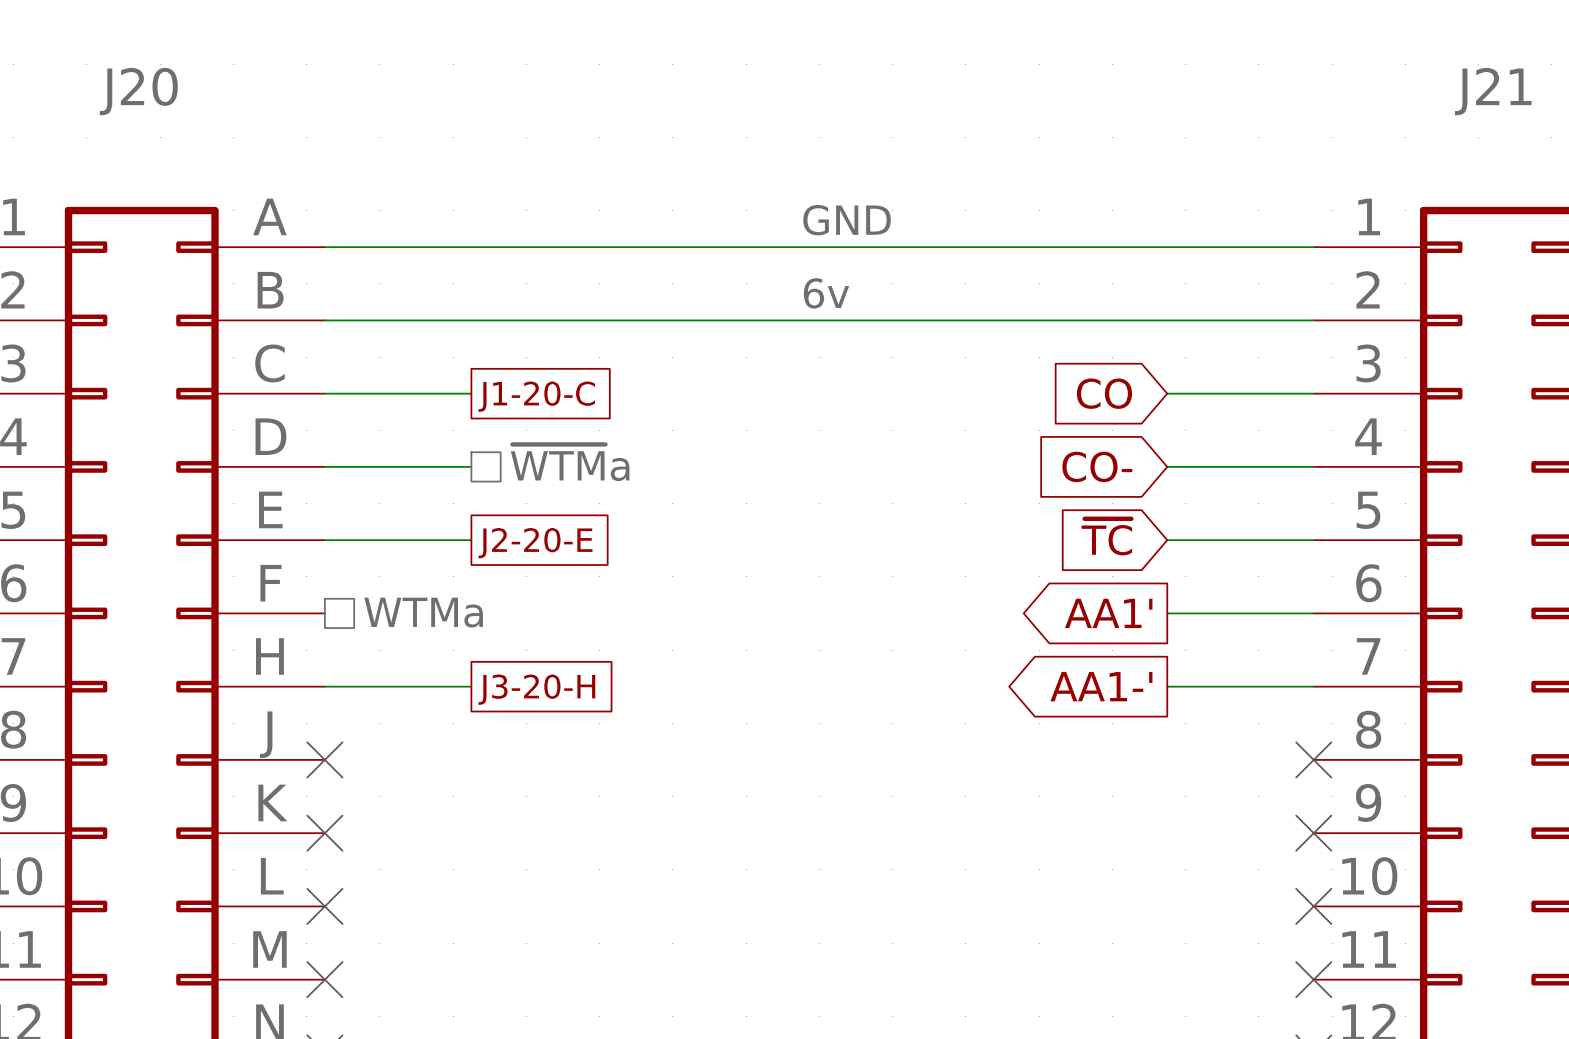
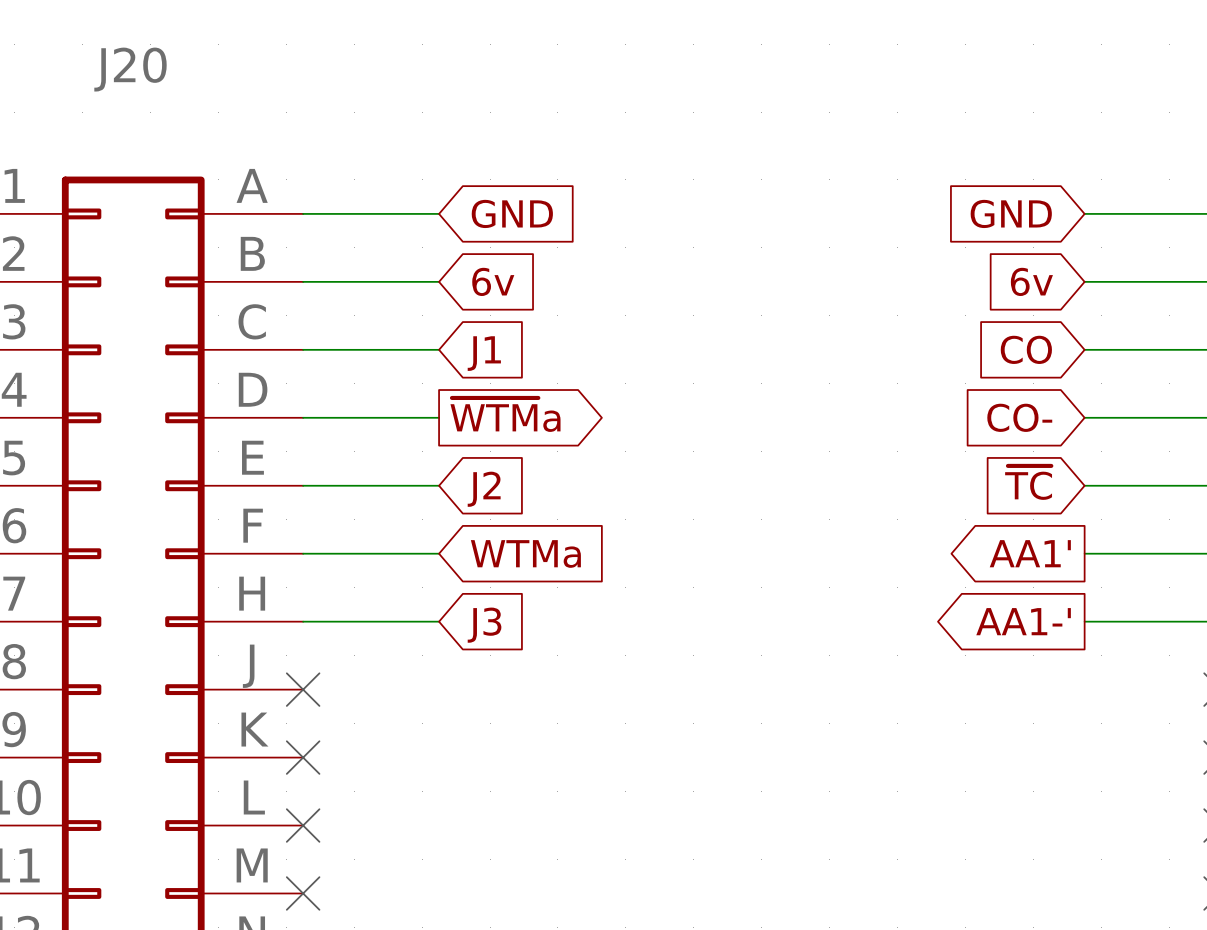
label: GND (847, 220) -> none
wire: (471, 247) (1167, 247) -> none
global label: none -> GND (512, 213)
global label: none -> GND (1011, 213)
label: 6v (826, 293) -> none
wire: (471, 320) (1167, 320) -> none
global label: none -> 6v (493, 281)
global label: none -> 6v (1031, 281)
global label shape: passive (536, 396) -> input (484, 353)
global label: J1-20-C (536, 396) -> J1 (484, 353)
hierarchical label: ~{WTM}a (570, 462) -> none
global label: none -> ~{WTM}a (505, 414)
global label shape: passive (535, 543) -> input (484, 489)
global label: J2-20-E (535, 543) -> J2 (484, 489)
hierarchical label: WTMa (423, 612) -> none
wire: none -> (303, 553) (439, 553)
global label: none -> WTMa (525, 553)
global label shape: passive (536, 689) -> input (484, 625)
global label: J3-20-H (536, 689) -> J3 (484, 625)

